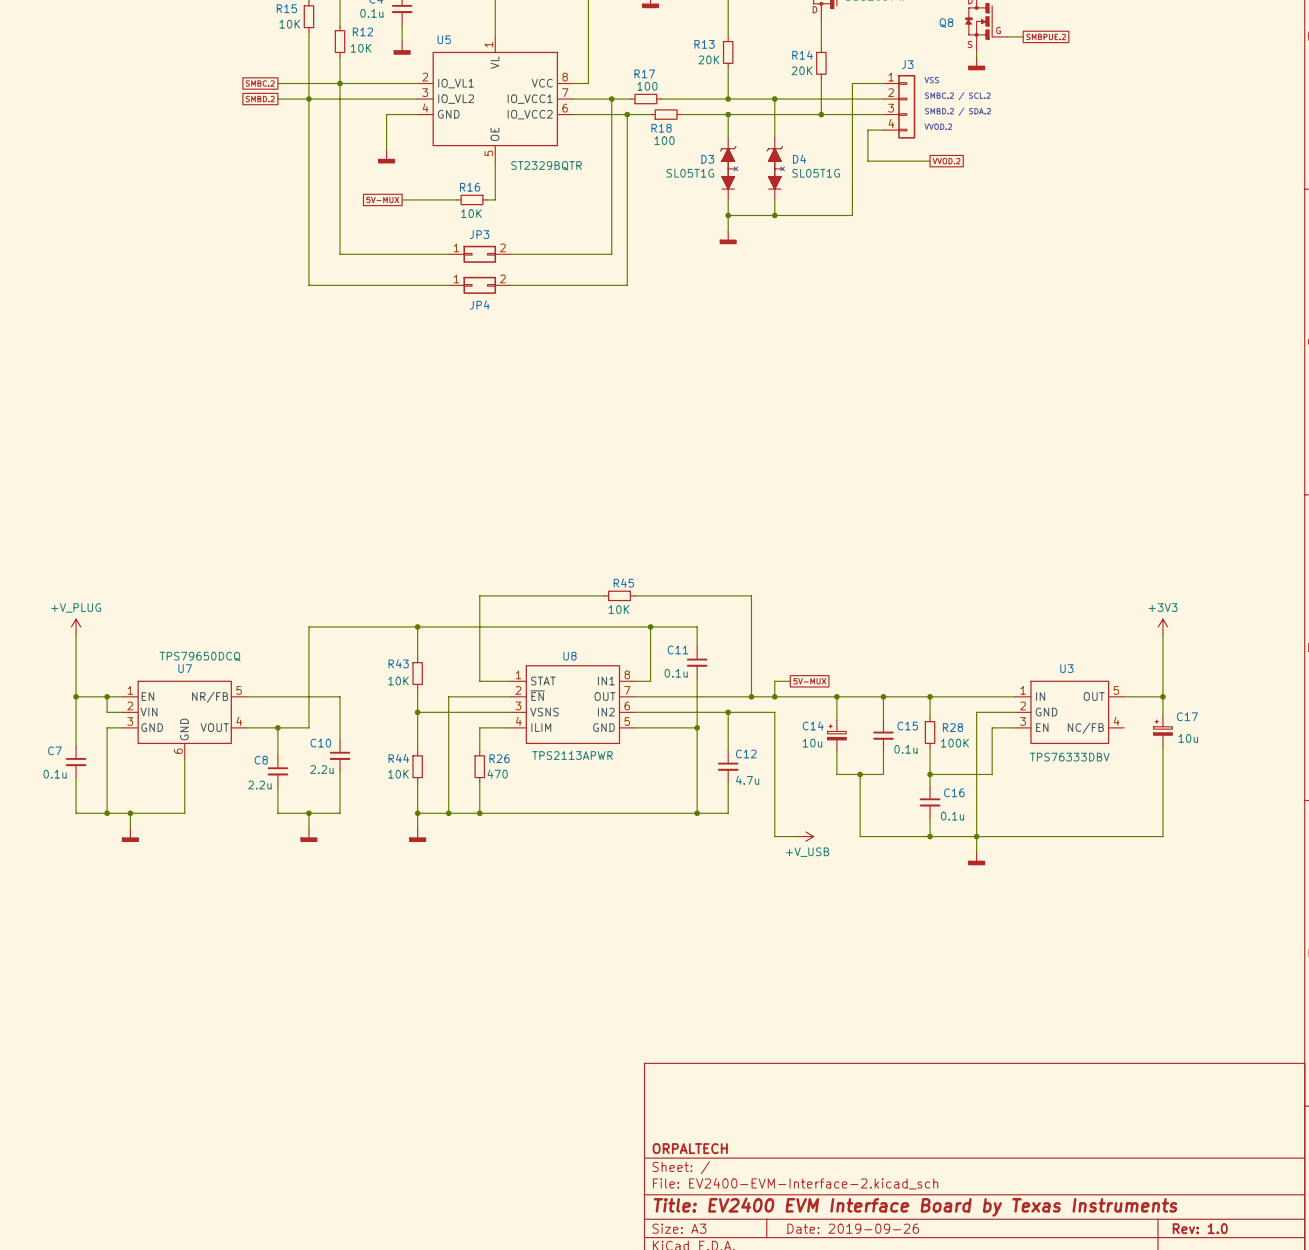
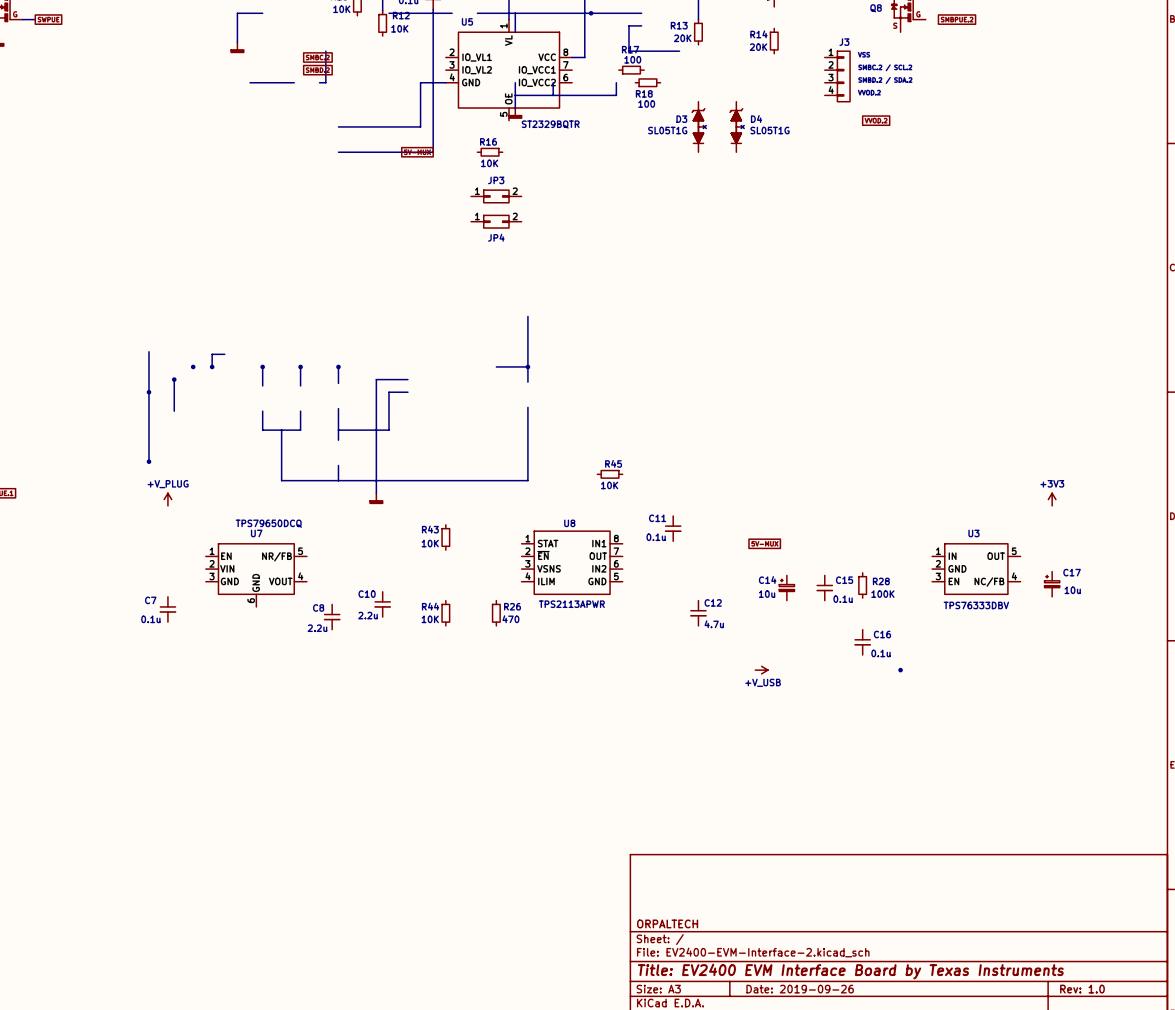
wire: (821, 21) (821, 47) -> none
wire: none -> (262, 13) (237, 13) (237, 42)
wire: none -> (388, 13) (452, 13)
wire: none -> (477, 13) (641, 13)
wire: none -> (515, 13) (515, 32)
junction: none -> (591, 13)
wire: (308, 32) (308, 285) (448, 285) -> none
wire: (1007, 36) (1023, 36) -> none
wire: none -> (433, 23) (433, 152) (338, 152)
wire: none -> (641, 25) (628, 25) (628, 51) (679, 51)
power symbol: (402, 48) -> none
wire: (976, 52) (976, 57) -> none
wire: (340, 57) (340, 254) (448, 254) -> none
power symbol: (976, 63) -> none
wire: (728, 67) (728, 99) -> none
power symbol: none -> (237, 47)
wire: none -> (325, 51) (325, 82) (319, 82)
wire: (821, 78) (821, 114) -> none
wire: (277, 83) (417, 83) -> none
junction: (340, 83) -> none
wire: (883, 83) (852, 83) (852, 215) (728, 215) -> none
wire: (277, 99) (417, 99) -> none
junction: (308, 99) -> none
wire: (572, 99) (630, 99) -> none
wire: (611, 99) (611, 254) (510, 254) -> none
junction: (611, 99) -> none
wire: (661, 99) (883, 99) -> none
junction: (728, 99) -> none
wire: (774, 99) (774, 137) -> none
junction: (774, 99) -> none
wire: none -> (250, 82) (294, 82)
wire: none -> (515, 82) (515, 108)
wire: none -> (553, 82) (553, 95)
wire: (572, 114) (650, 114) -> none
junction: (627, 114) -> none
wire: (681, 114) (883, 114) -> none
wire: (728, 114) (728, 137) -> none
junction: (728, 114) -> none
junction: (821, 114) -> none
wire: (627, 130) (627, 285) (510, 285) -> (616, 95) (515, 95)
wire: (883, 130) (867, 130) (867, 161) (930, 161) -> none
wire: none -> (420, 111) (420, 126) (338, 126)
power symbol: none -> (515, 113)
power symbol: (386, 156) -> none
wire: (495, 161) (495, 199) (487, 199) -> none
wire: (402, 199) (456, 199) -> none
wire: (728, 199) (728, 231) -> none
wire: (774, 199) (774, 215) -> none
junction: (728, 215) -> none
junction: (774, 215) -> none
power symbol: (728, 237) -> none
wire: none -> (527, 316) (527, 382)
wire: none -> (148, 351) (148, 461)
wire: none -> (224, 354) (212, 354) (212, 366)
junction: none -> (193, 366)
junction: none -> (212, 366)
wire: none -> (262, 366) (262, 385)
junction: none -> (262, 366)
wire: none -> (300, 366) (300, 385)
junction: none -> (300, 366)
wire: none -> (338, 366) (338, 383)
junction: none -> (338, 366)
wire: none -> (496, 366) (527, 366)
junction: none -> (527, 366)
wire: none -> (174, 379) (174, 411)
junction: none -> (174, 379)
wire: none -> (407, 379) (376, 379) (376, 493)
junction: none -> (148, 392)
wire: none -> (407, 392) (388, 392) (388, 430) (338, 430)
wire: none -> (527, 407) (527, 480) (281, 480) (281, 430)
wire: none -> (338, 408) (338, 440)
wire: none -> (262, 411) (262, 430) (300, 430) (300, 411)
junction: none -> (148, 461)
wire: none -> (338, 465) (338, 480)
wire: (603, 595) (479, 595) (479, 681) (510, 681) -> none
wire: (635, 595) (751, 595) (751, 696) -> none
power symbol: none -> (376, 498)
wire: (417, 626) (417, 658) -> none
junction: (417, 626) -> none
wire: (650, 626) (650, 681) (635, 681) -> none
junction: (650, 626) -> none
wire: (76, 634) (76, 746) -> none
wire: (1162, 634) (1162, 715) -> none
wire: (697, 647) (697, 626) (308, 626) (308, 727) (246, 727) -> none
wire: (697, 678) (697, 813) -> none
wire: (790, 681) (774, 681) (774, 696) -> none
wire: (417, 689) (417, 751) -> none
wire: (76, 696) (122, 696) -> none
junction: (76, 696) -> none
wire: (107, 696) (107, 712) (122, 712) -> none
junction: (107, 696) -> none
wire: (246, 696) (340, 696) (340, 740) -> none
wire: (510, 696) (448, 696) (448, 813) -> none
wire: (635, 696) (1015, 696) -> none
junction: (751, 696) -> none
junction: (774, 696) -> none
wire: (836, 696) (836, 720) -> none
junction: (836, 696) -> none
wire: (883, 696) (883, 720) -> none
junction: (883, 696) -> none
wire: (930, 696) (930, 717) -> none
junction: (930, 696) -> none
wire: (1124, 696) (1162, 696) -> none
junction: (1162, 696) -> none
wire: (417, 712) (510, 712) -> none
junction: (417, 712) -> none
wire: (635, 712) (774, 712) (774, 836) (798, 836) -> none
wire: (728, 712) (728, 751) -> none
junction: (728, 712) -> none
wire: (1015, 712) (976, 712) (976, 852) -> none
wire: (122, 727) (107, 727) (107, 813) -> none
wire: (277, 727) (277, 755) -> none
junction: (277, 727) -> none
wire: (510, 727) (479, 727) (479, 751) -> none
wire: (635, 727) (697, 727) -> none
junction: (697, 727) -> none
wire: (1015, 727) (992, 727) (992, 774) (930, 774) -> none
wire: (1162, 746) (1162, 836) (860, 836) (860, 774) -> none
wire: (930, 748) (930, 786) -> none
wire: (836, 751) (836, 774) (883, 774) (883, 751) -> none
wire: (184, 758) (184, 813) (76, 813) (76, 777) -> none
wire: (340, 771) (340, 813) (277, 813) (277, 786) -> none
junction: (860, 774) -> none
junction: (930, 774) -> none
wire: (417, 782) (417, 828) -> none
wire: (479, 782) (479, 813) -> none
wire: (728, 782) (728, 813) (417, 813) -> none
junction: (107, 813) -> none
wire: (130, 813) (130, 828) -> none
junction: (130, 813) -> none
wire: (308, 813) (308, 828) -> none
junction: (308, 813) -> none
junction: (417, 813) -> none
junction: (448, 813) -> none
junction: (479, 813) -> none
junction: (697, 813) -> none
wire: (930, 817) (930, 836) -> none
power symbol: (130, 835) -> none
power symbol: (308, 835) -> none
power symbol: (417, 835) -> none
junction: (930, 836) -> none
power symbol: (976, 858) -> none

